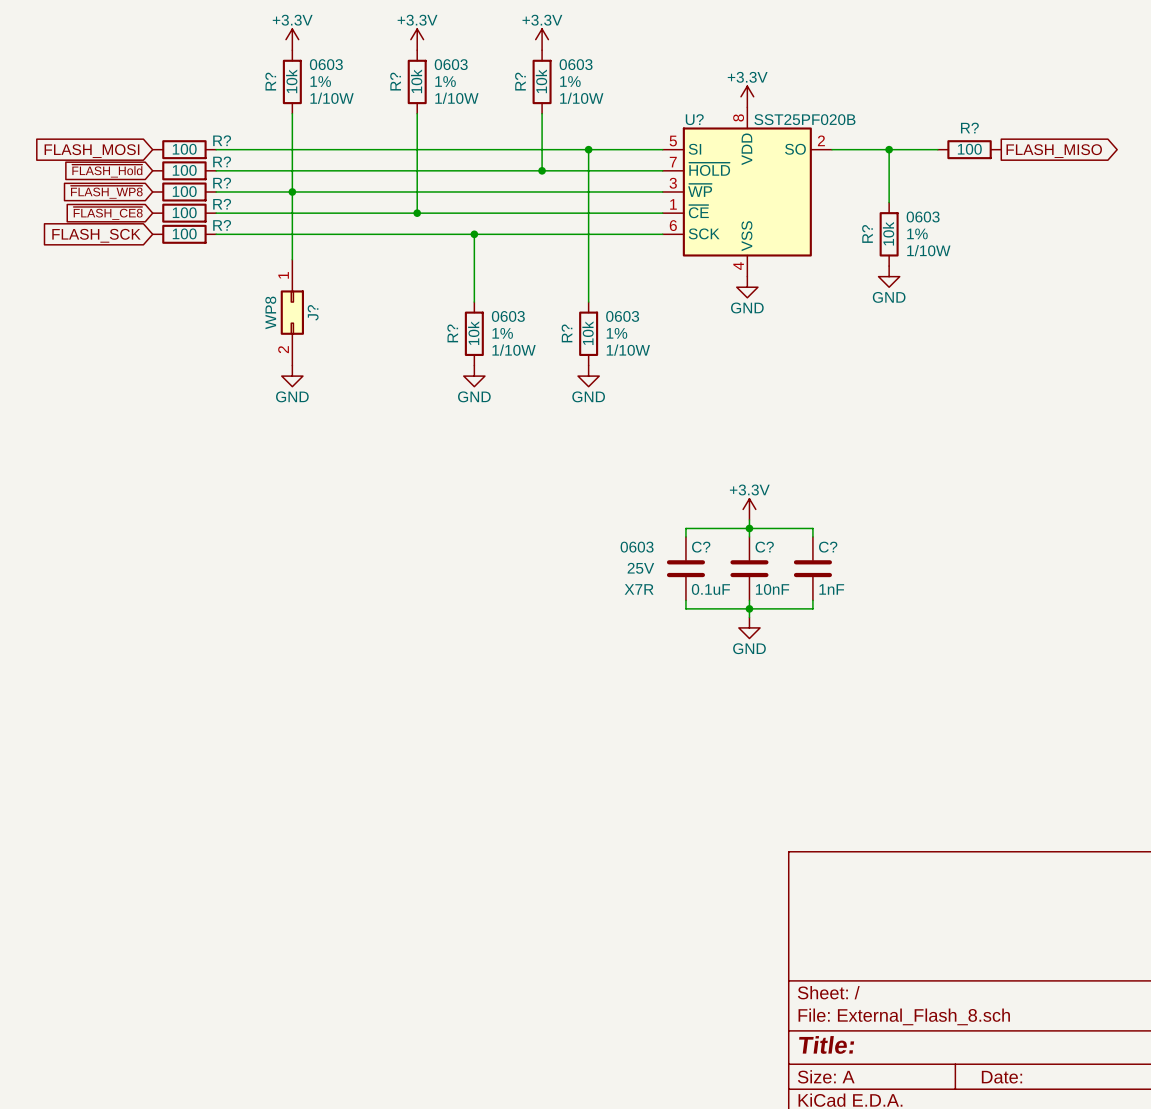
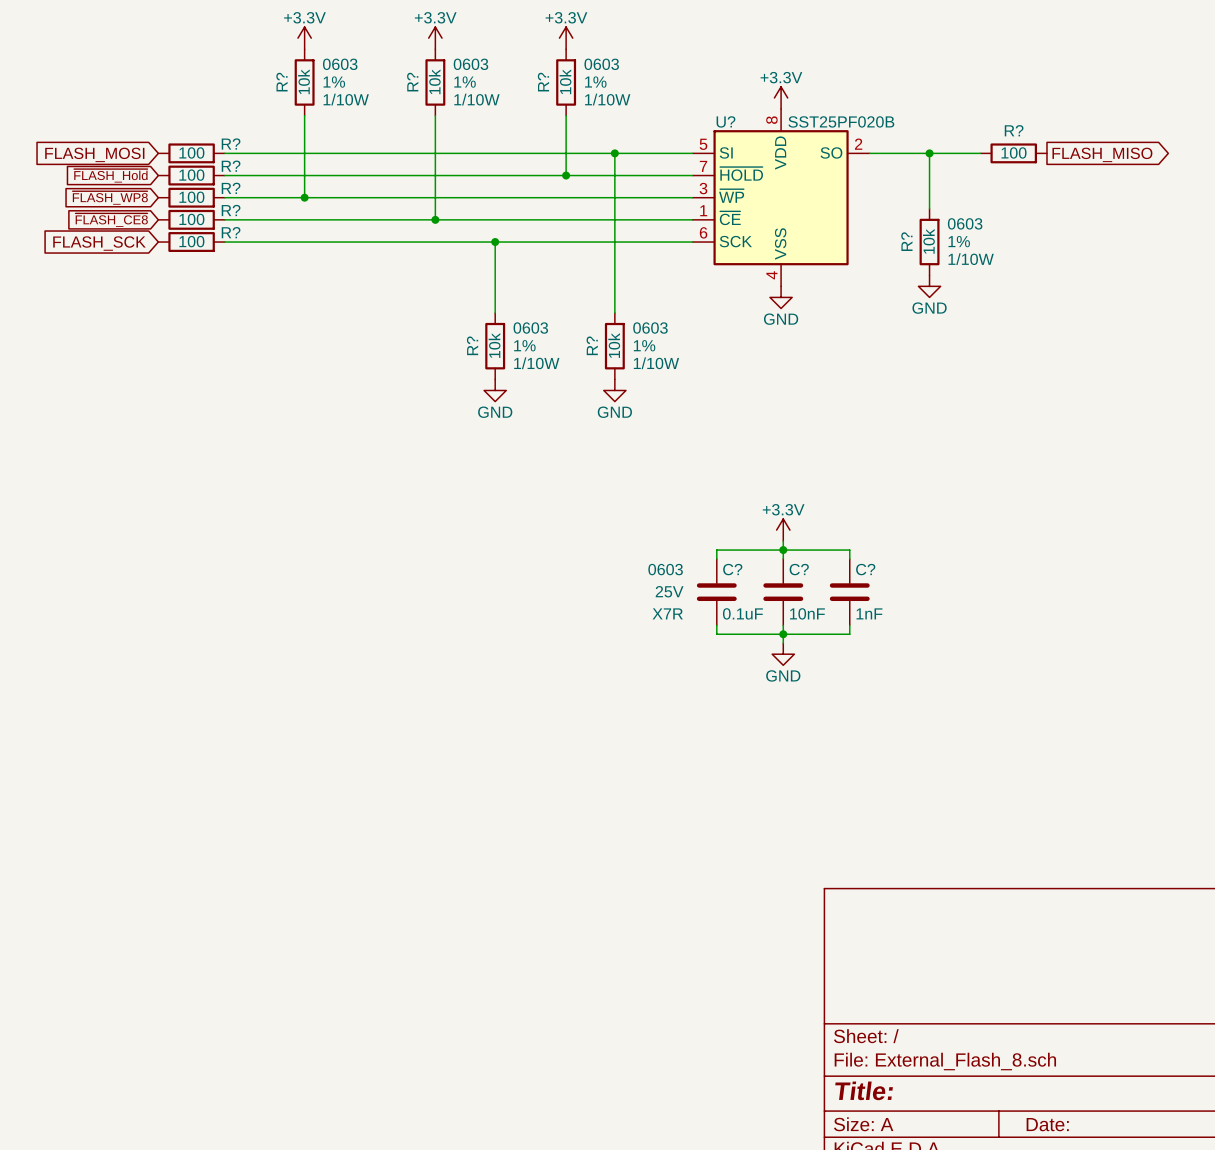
wire: (292, 191) (292, 259) -> none
J?: WP8 (292, 312) -> none
power symbol: GND (292, 376) -> none

